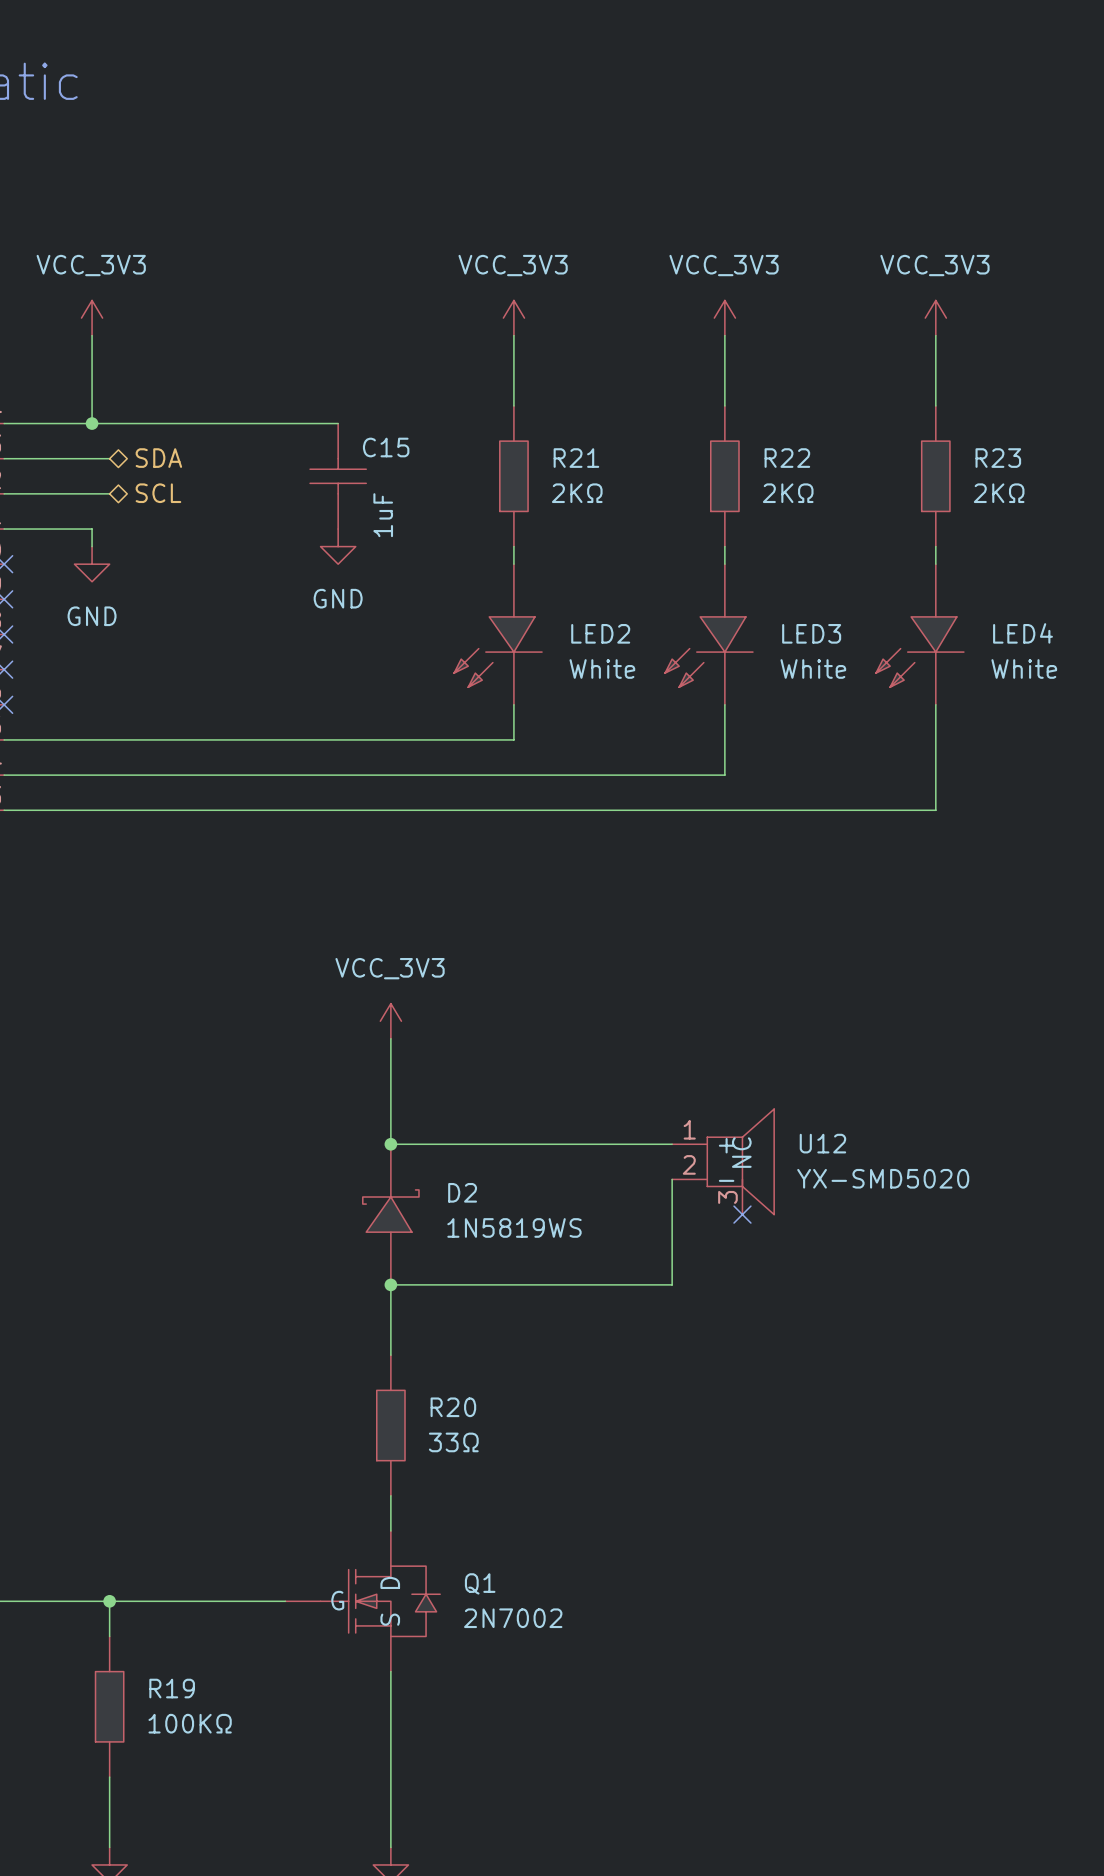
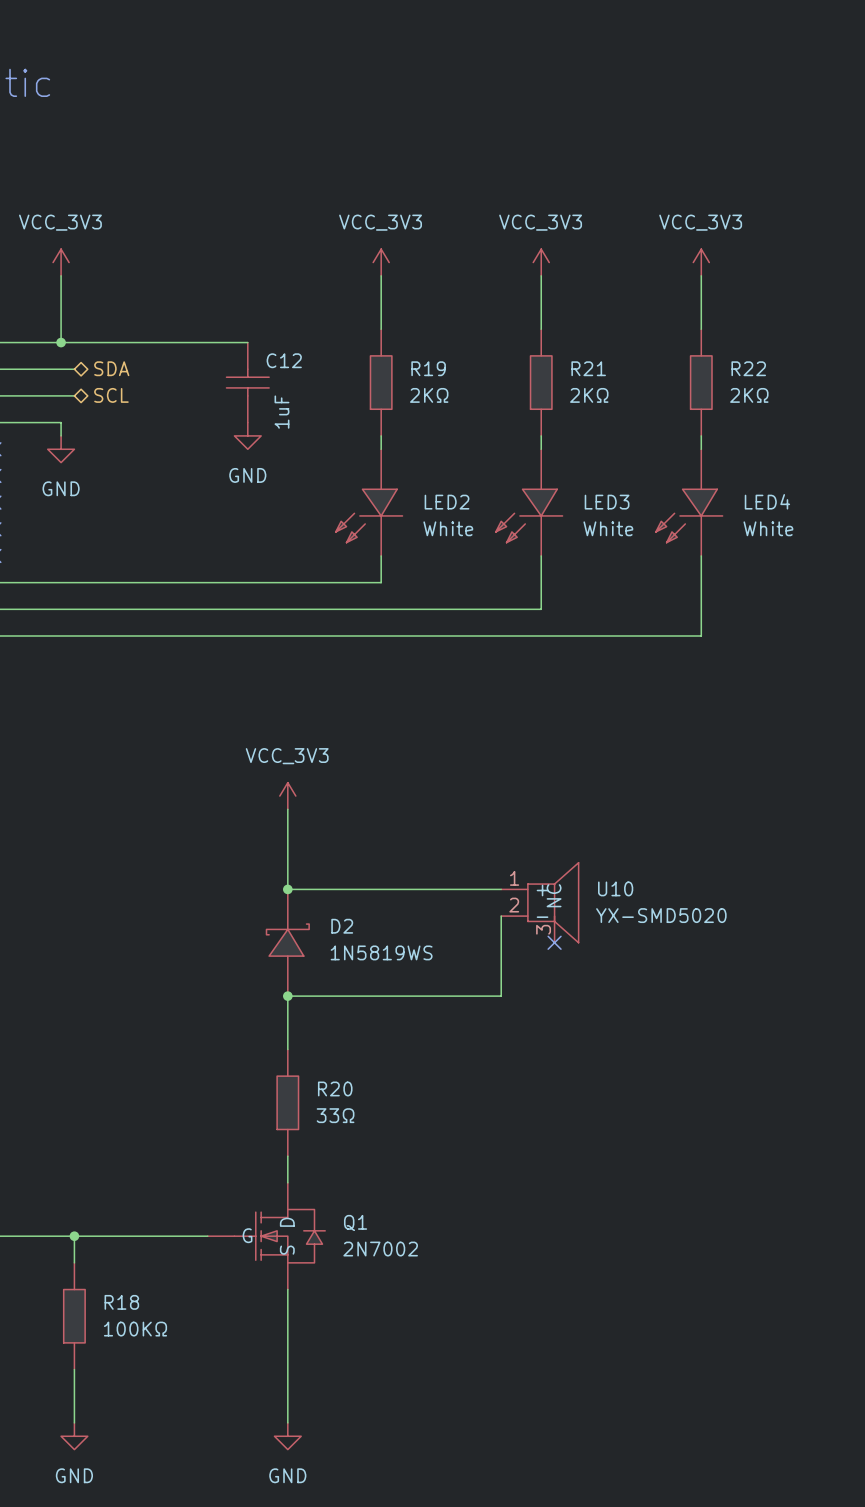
C15 name: C15 (386, 447) -> C12 (284, 360)
R21 name: R21 (576, 458) -> R19 (428, 368)
R22 name: R22 (787, 458) -> R21 (588, 368)
R23 name: R23 (998, 458) -> R22 (748, 368)
U12 name: U12 (822, 1143) -> U10 (615, 888)
R19 name: R19 (172, 1688) -> R18 (121, 1302)

